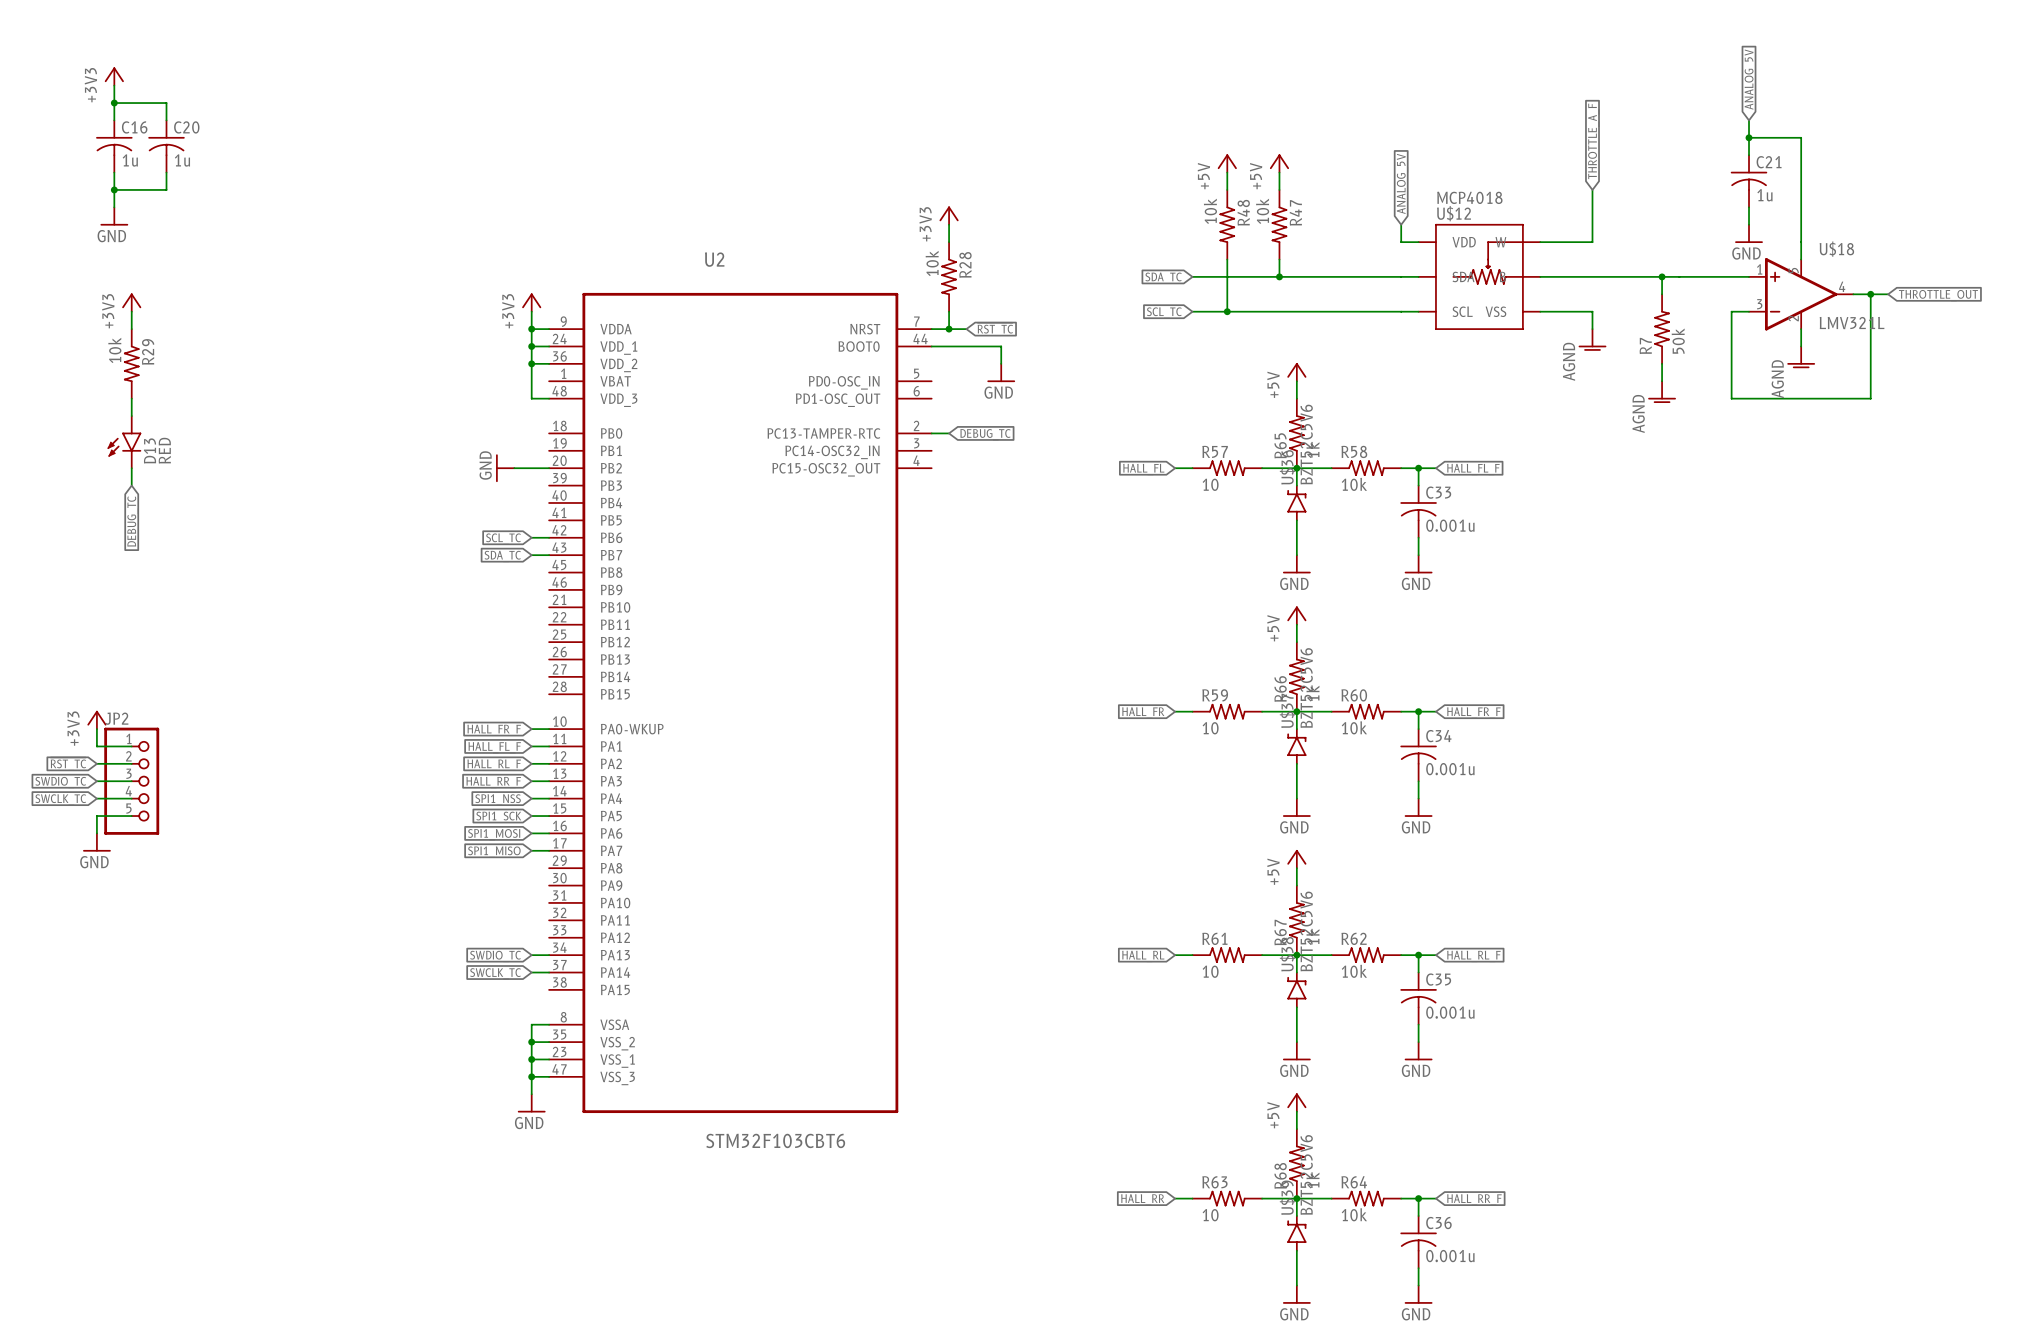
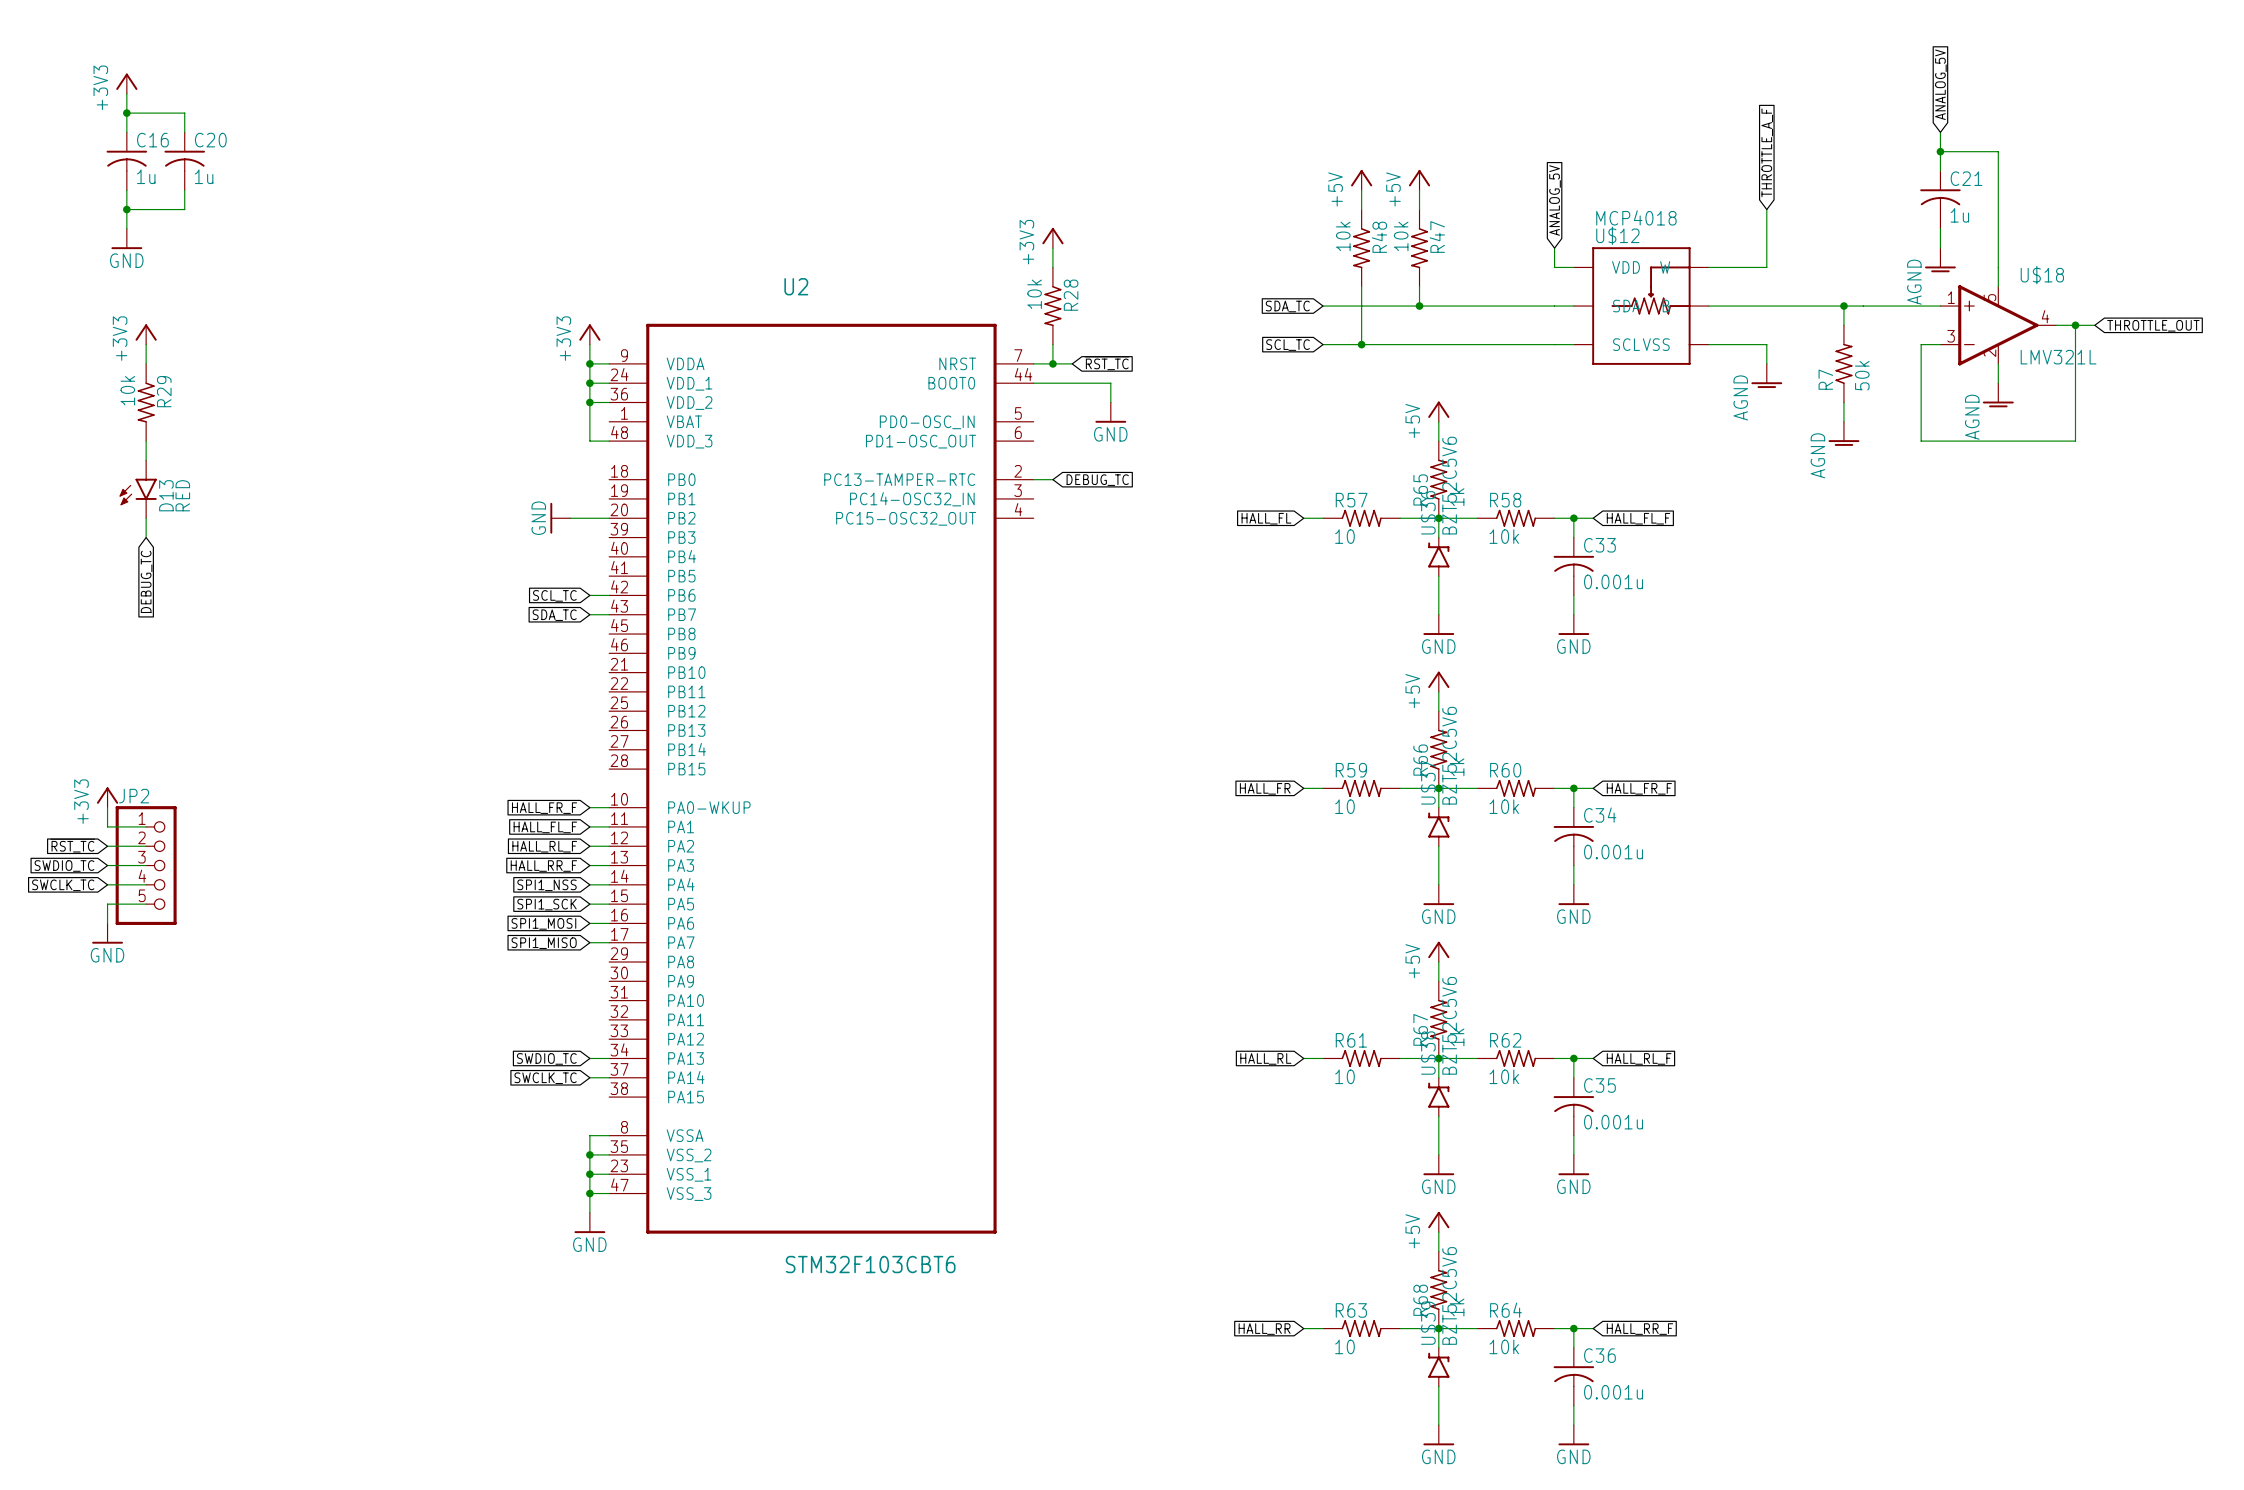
power symbol: GND (1749, 233) -> AGND (1940, 260)

